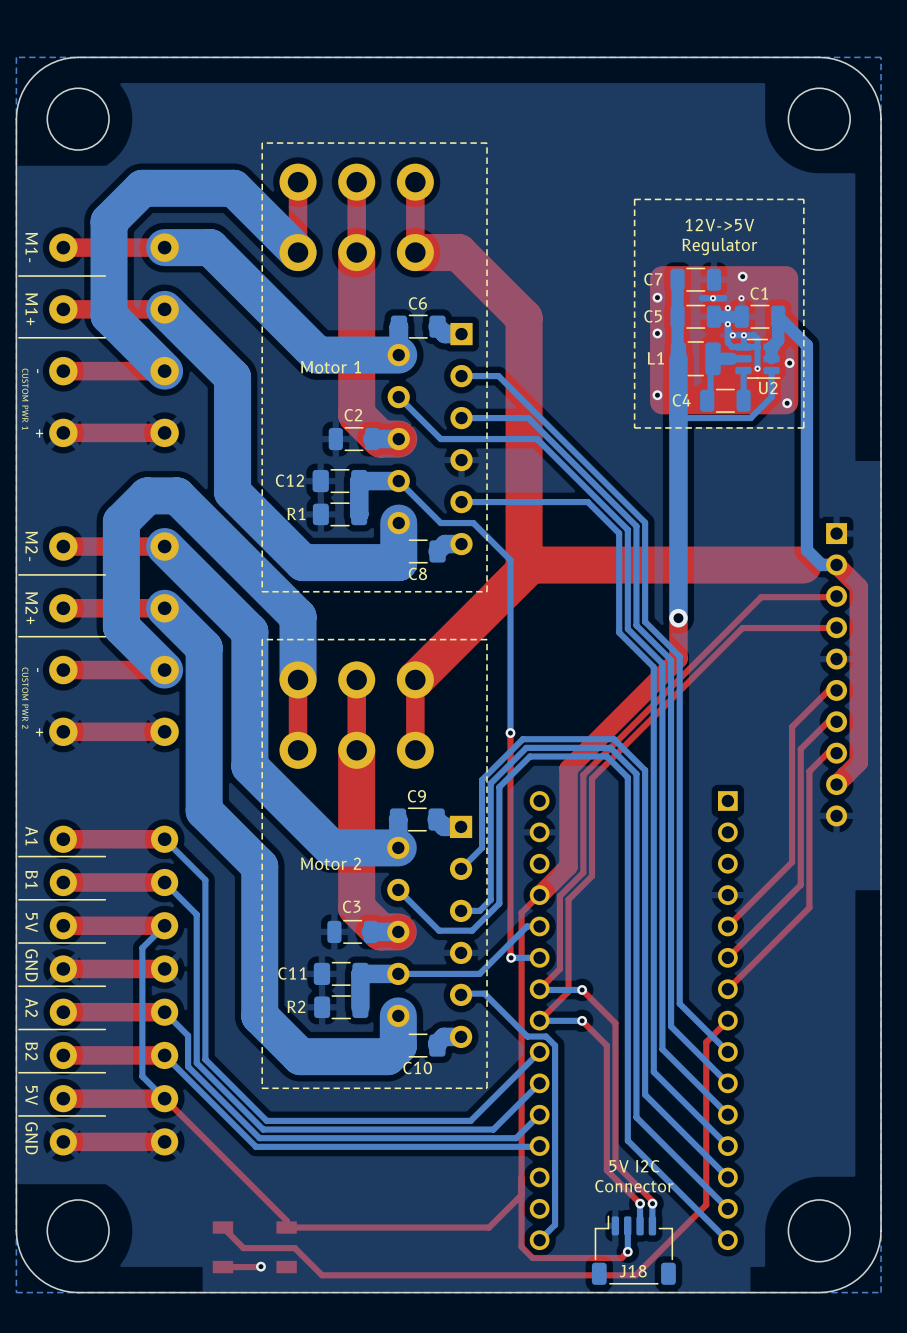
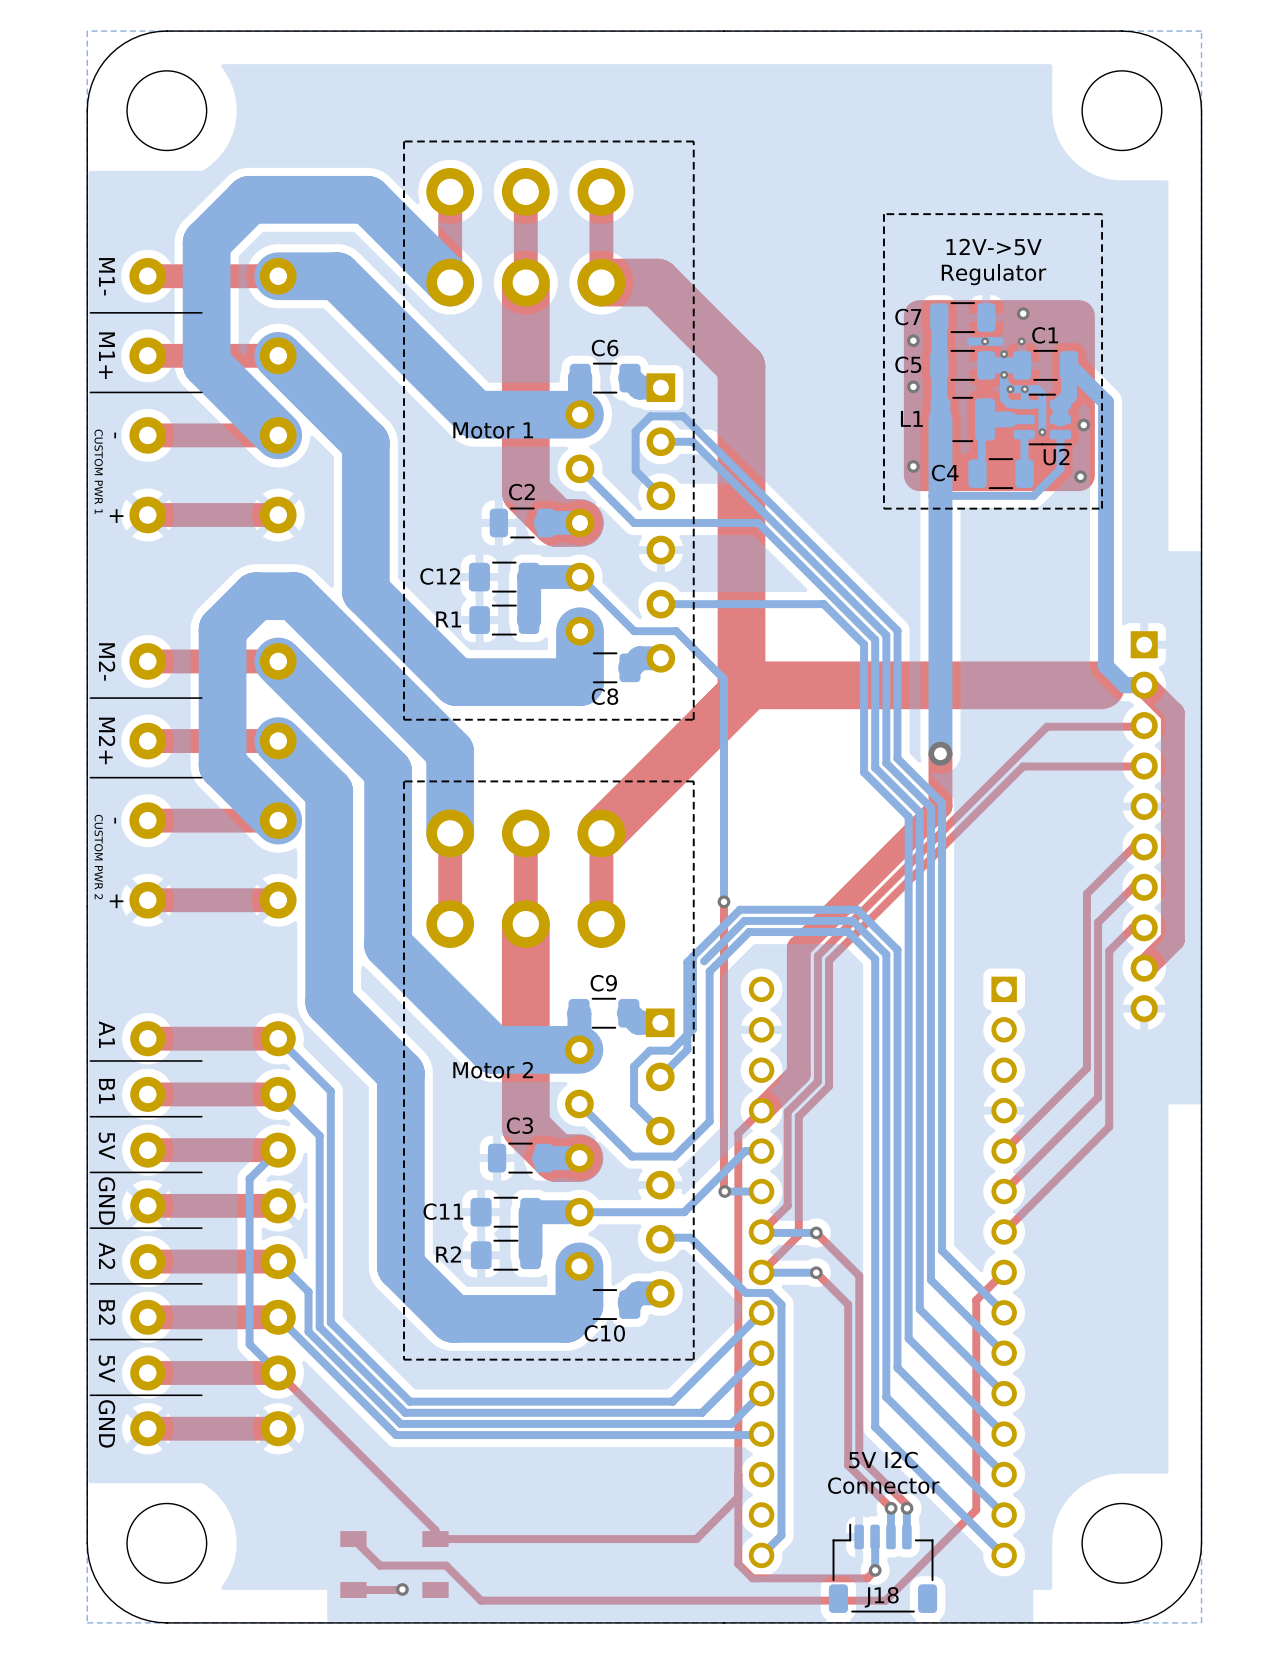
bottom track: (498, 376) (486, 376) -> (708, 441) (683, 416) (650, 416) (635, 431) (635, 470) (660, 495)
bottom track: (528, 418) (461, 418) -> (746, 495) (692, 441)
bottom track: (495, 779) (490, 783) (490, 899) (479, 910) (461, 910) -> (692, 956) (692, 1029) (671, 1050) (649, 1050) (634, 1066) (634, 1104) (660, 1131)

